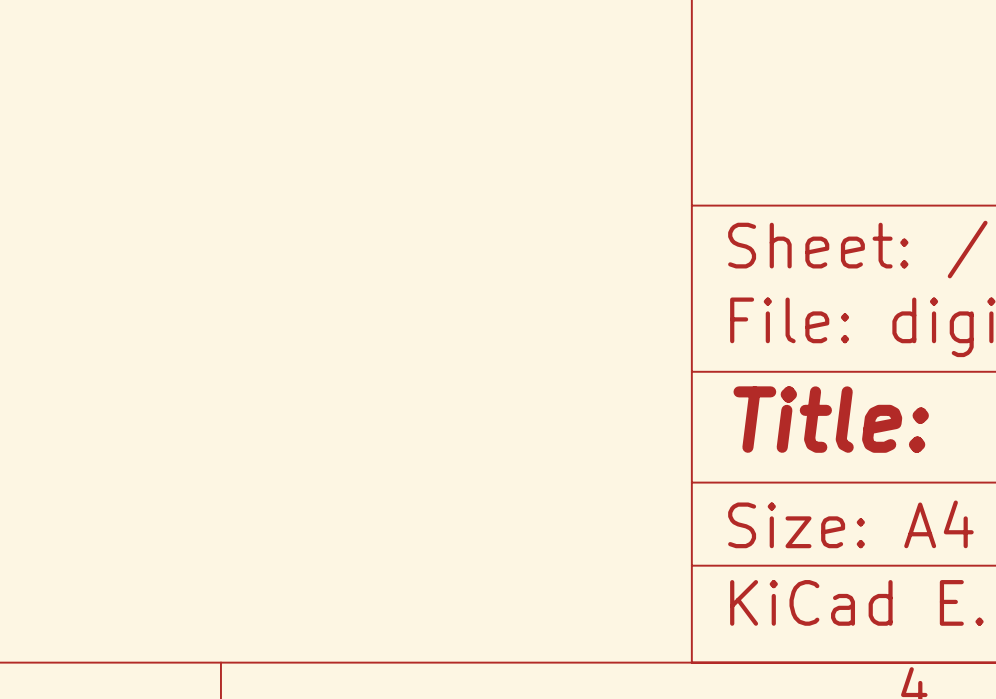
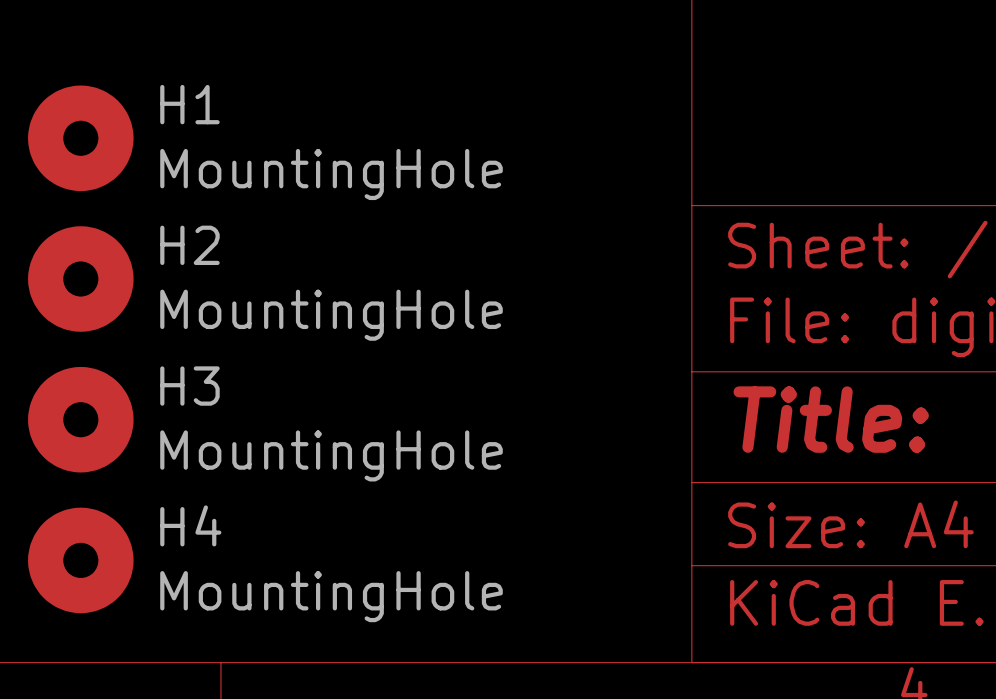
H1: none -> MountingHole (80, 138)
H2: none -> MountingHole (80, 279)
H3: none -> MountingHole (80, 419)
H4: none -> MountingHole (80, 560)

